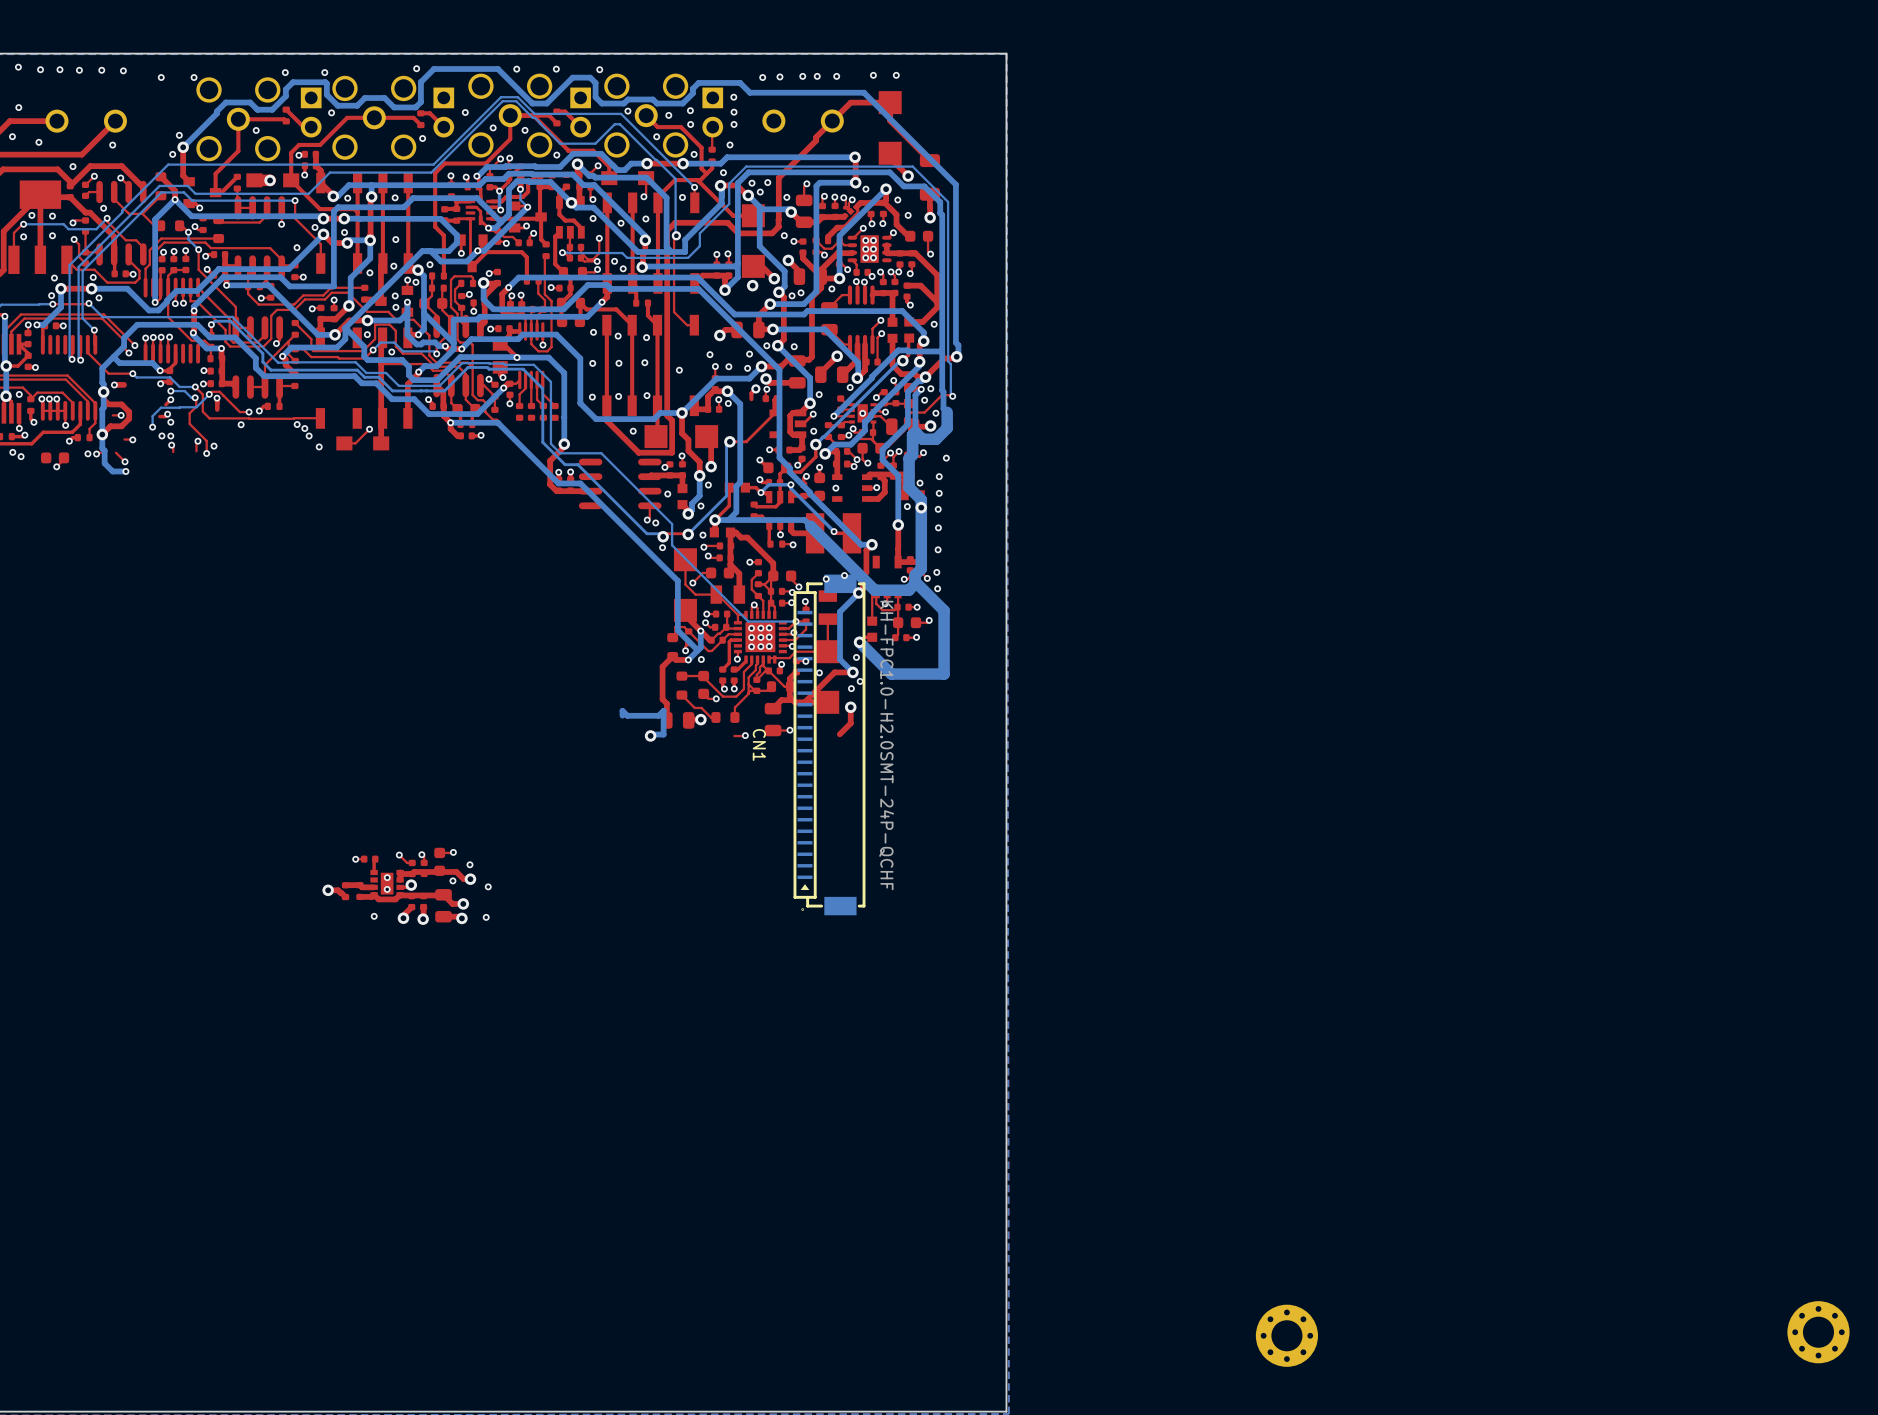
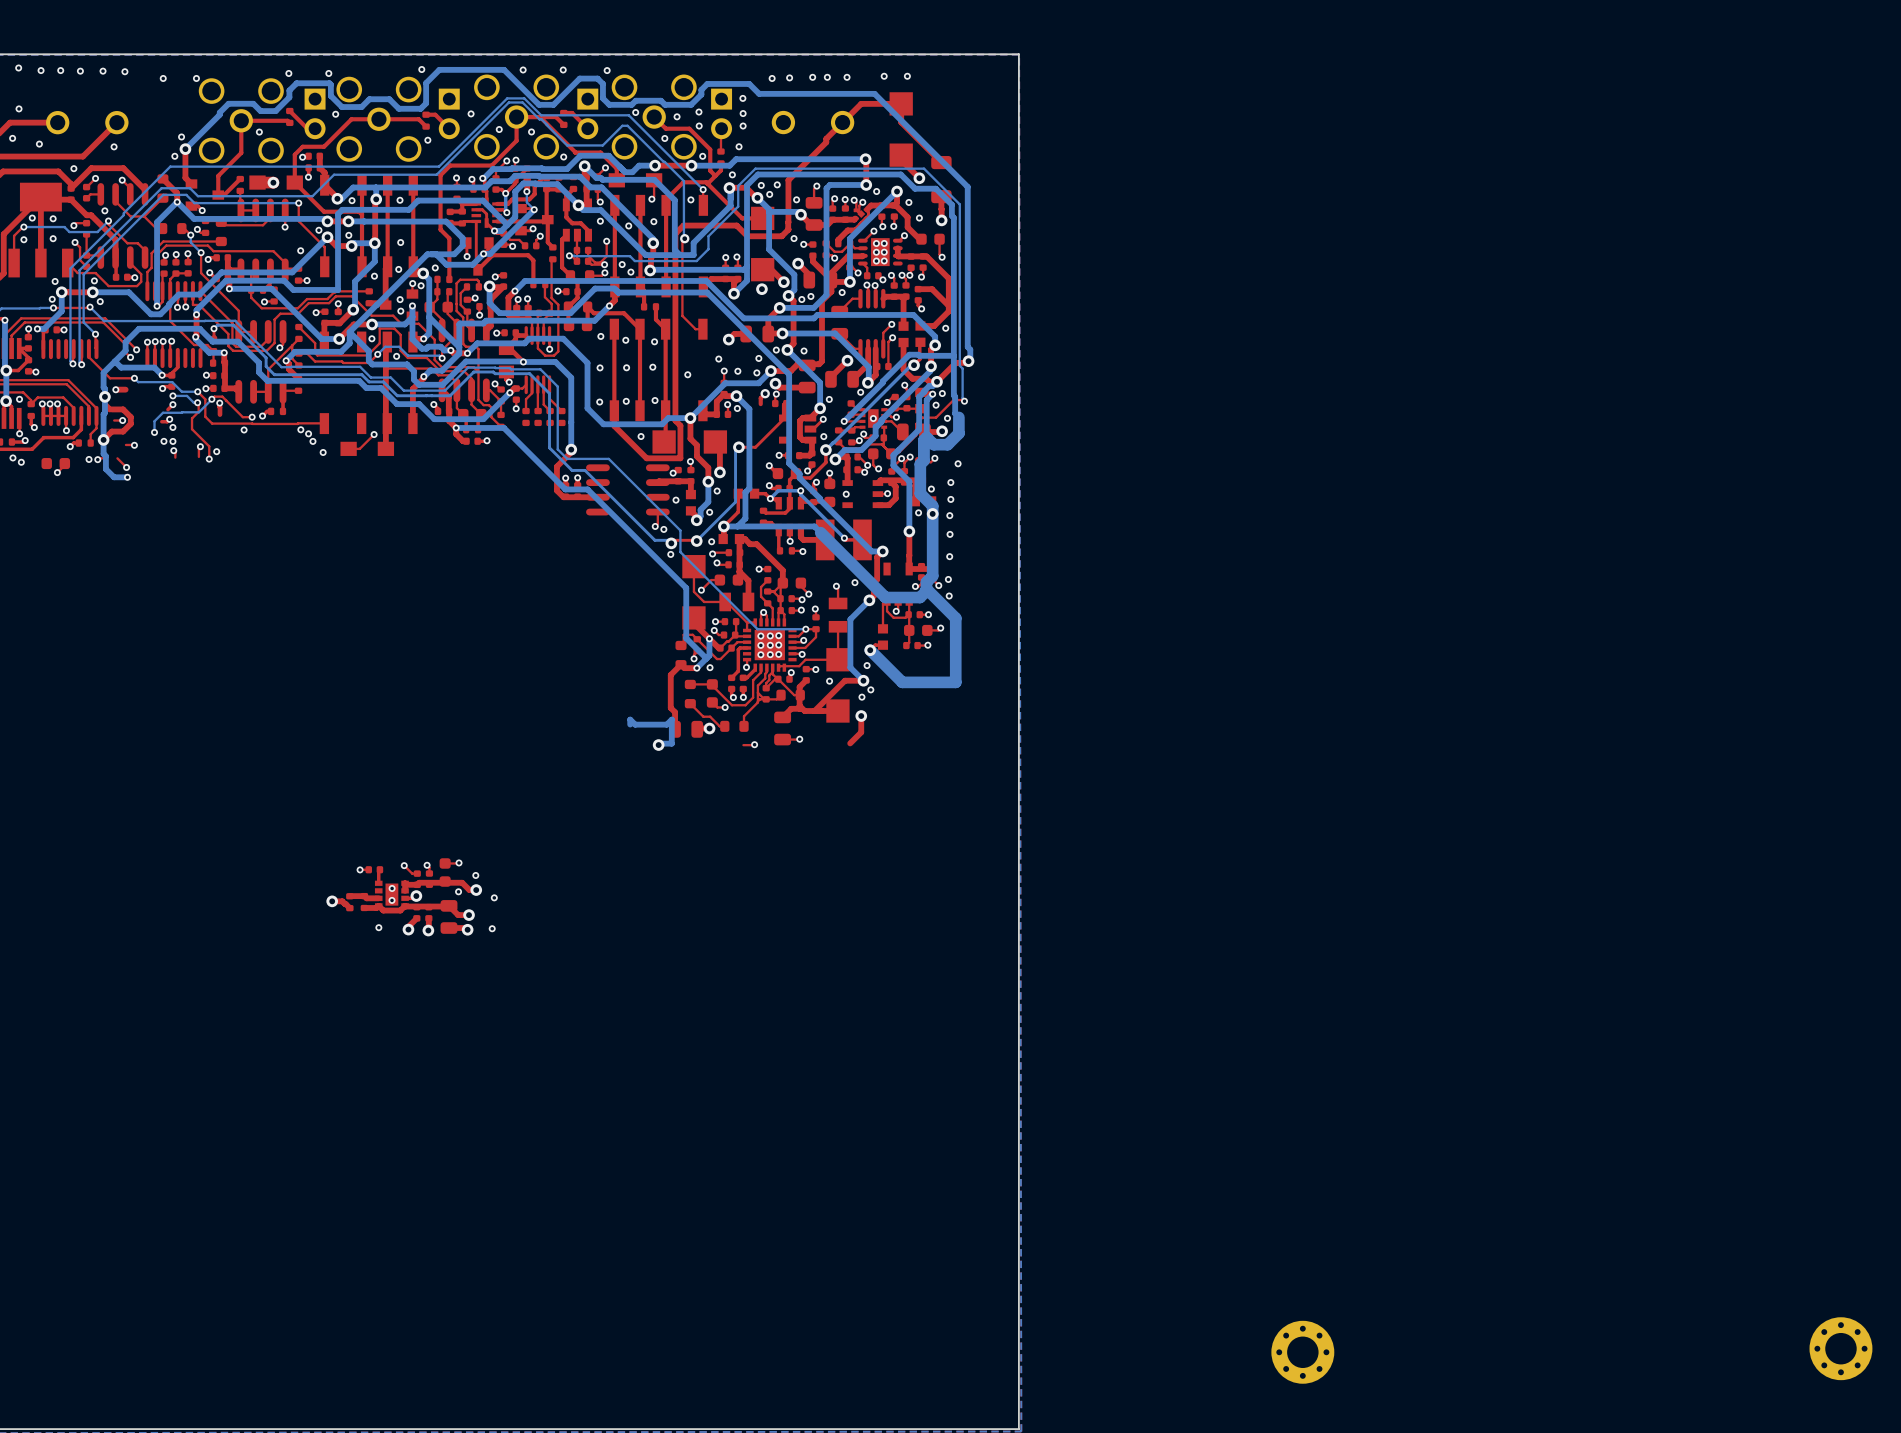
CN1: KH-FPC1.0-H2.0SMT-24P-QCHF (829, 744) -> none

